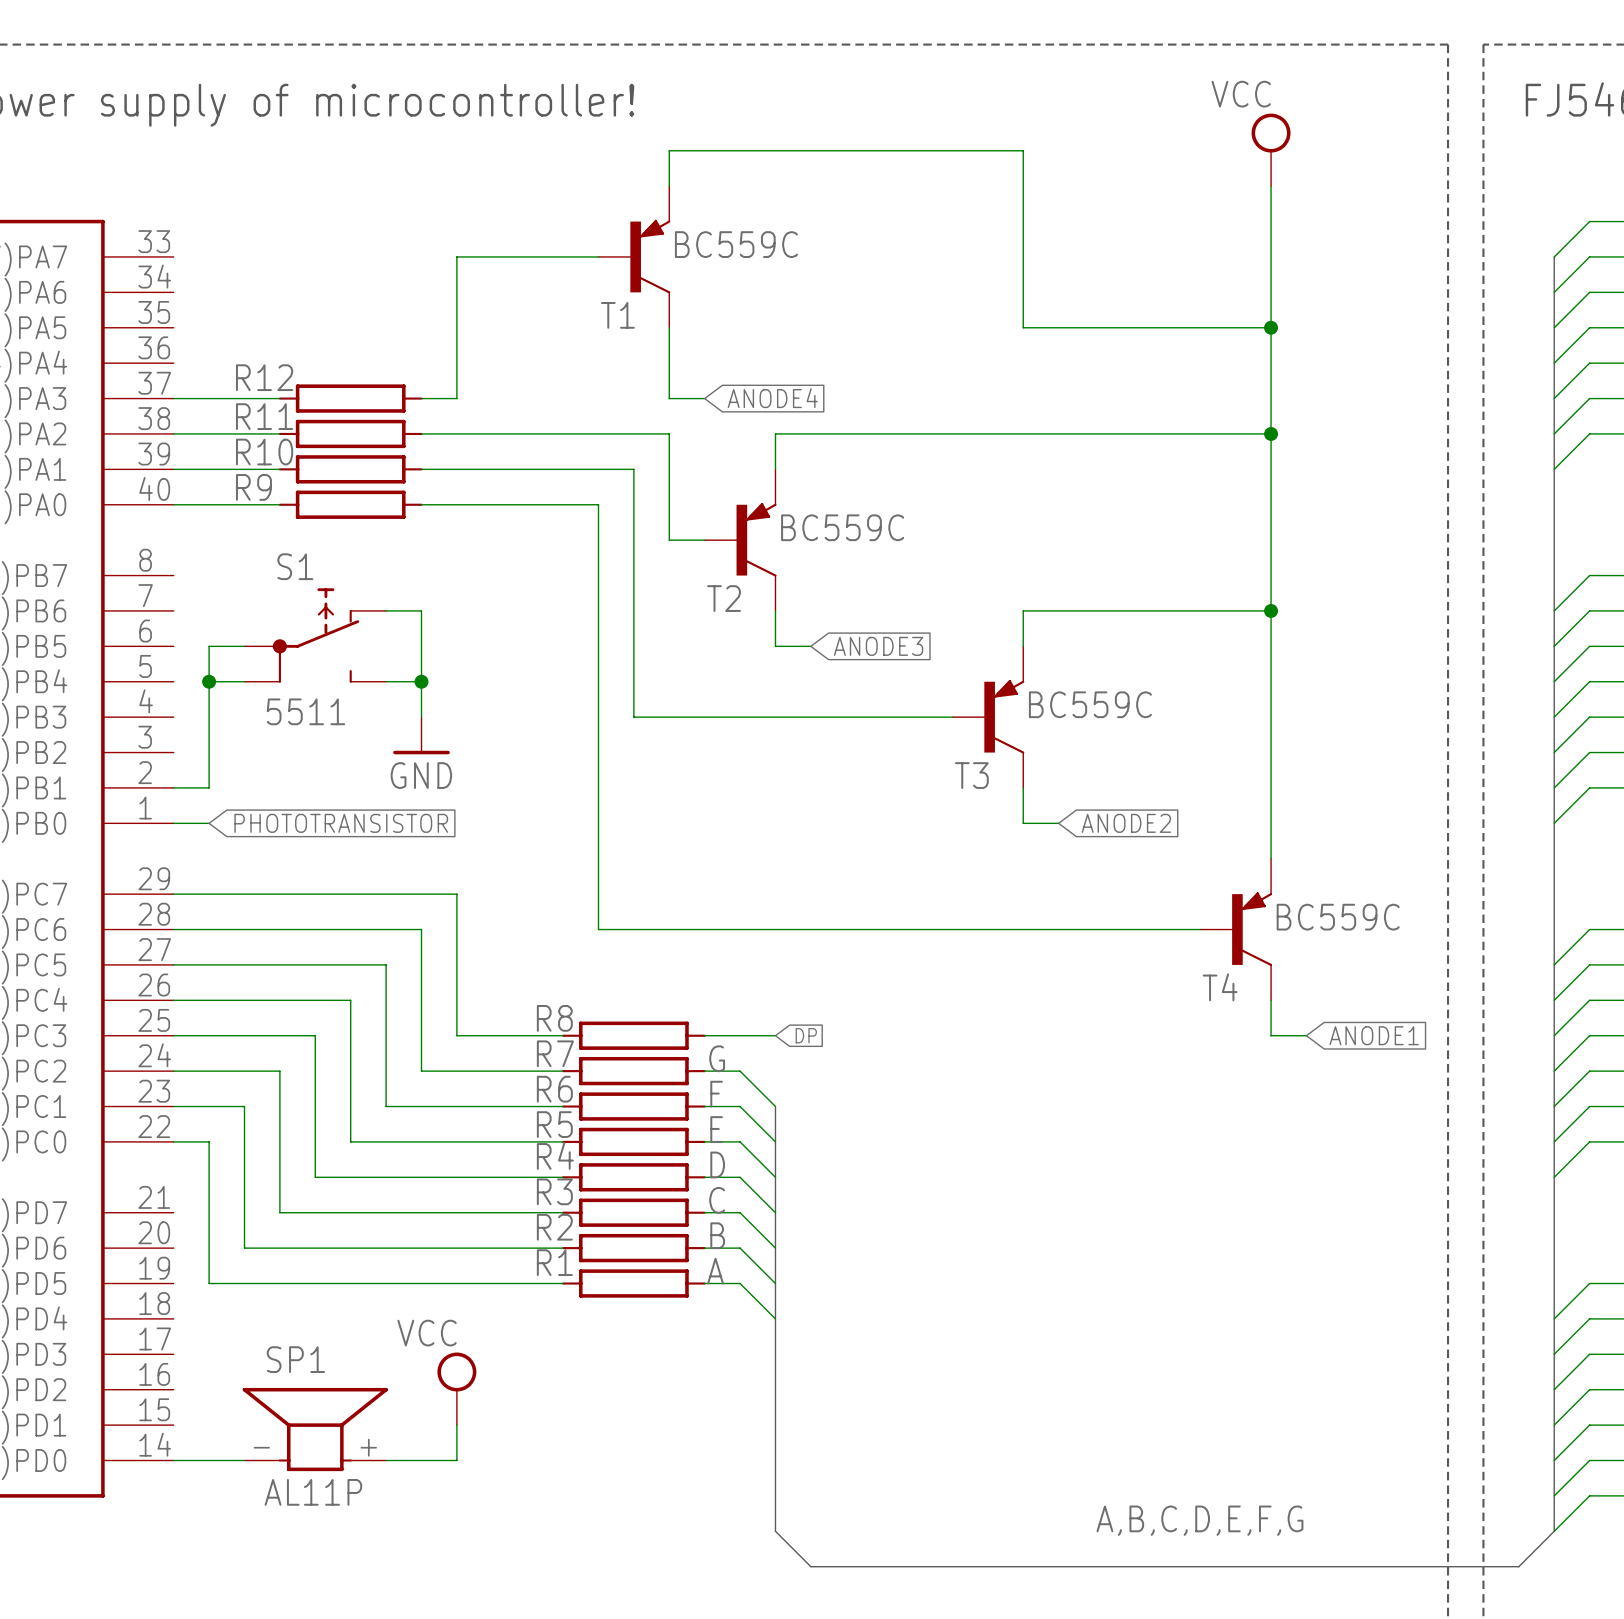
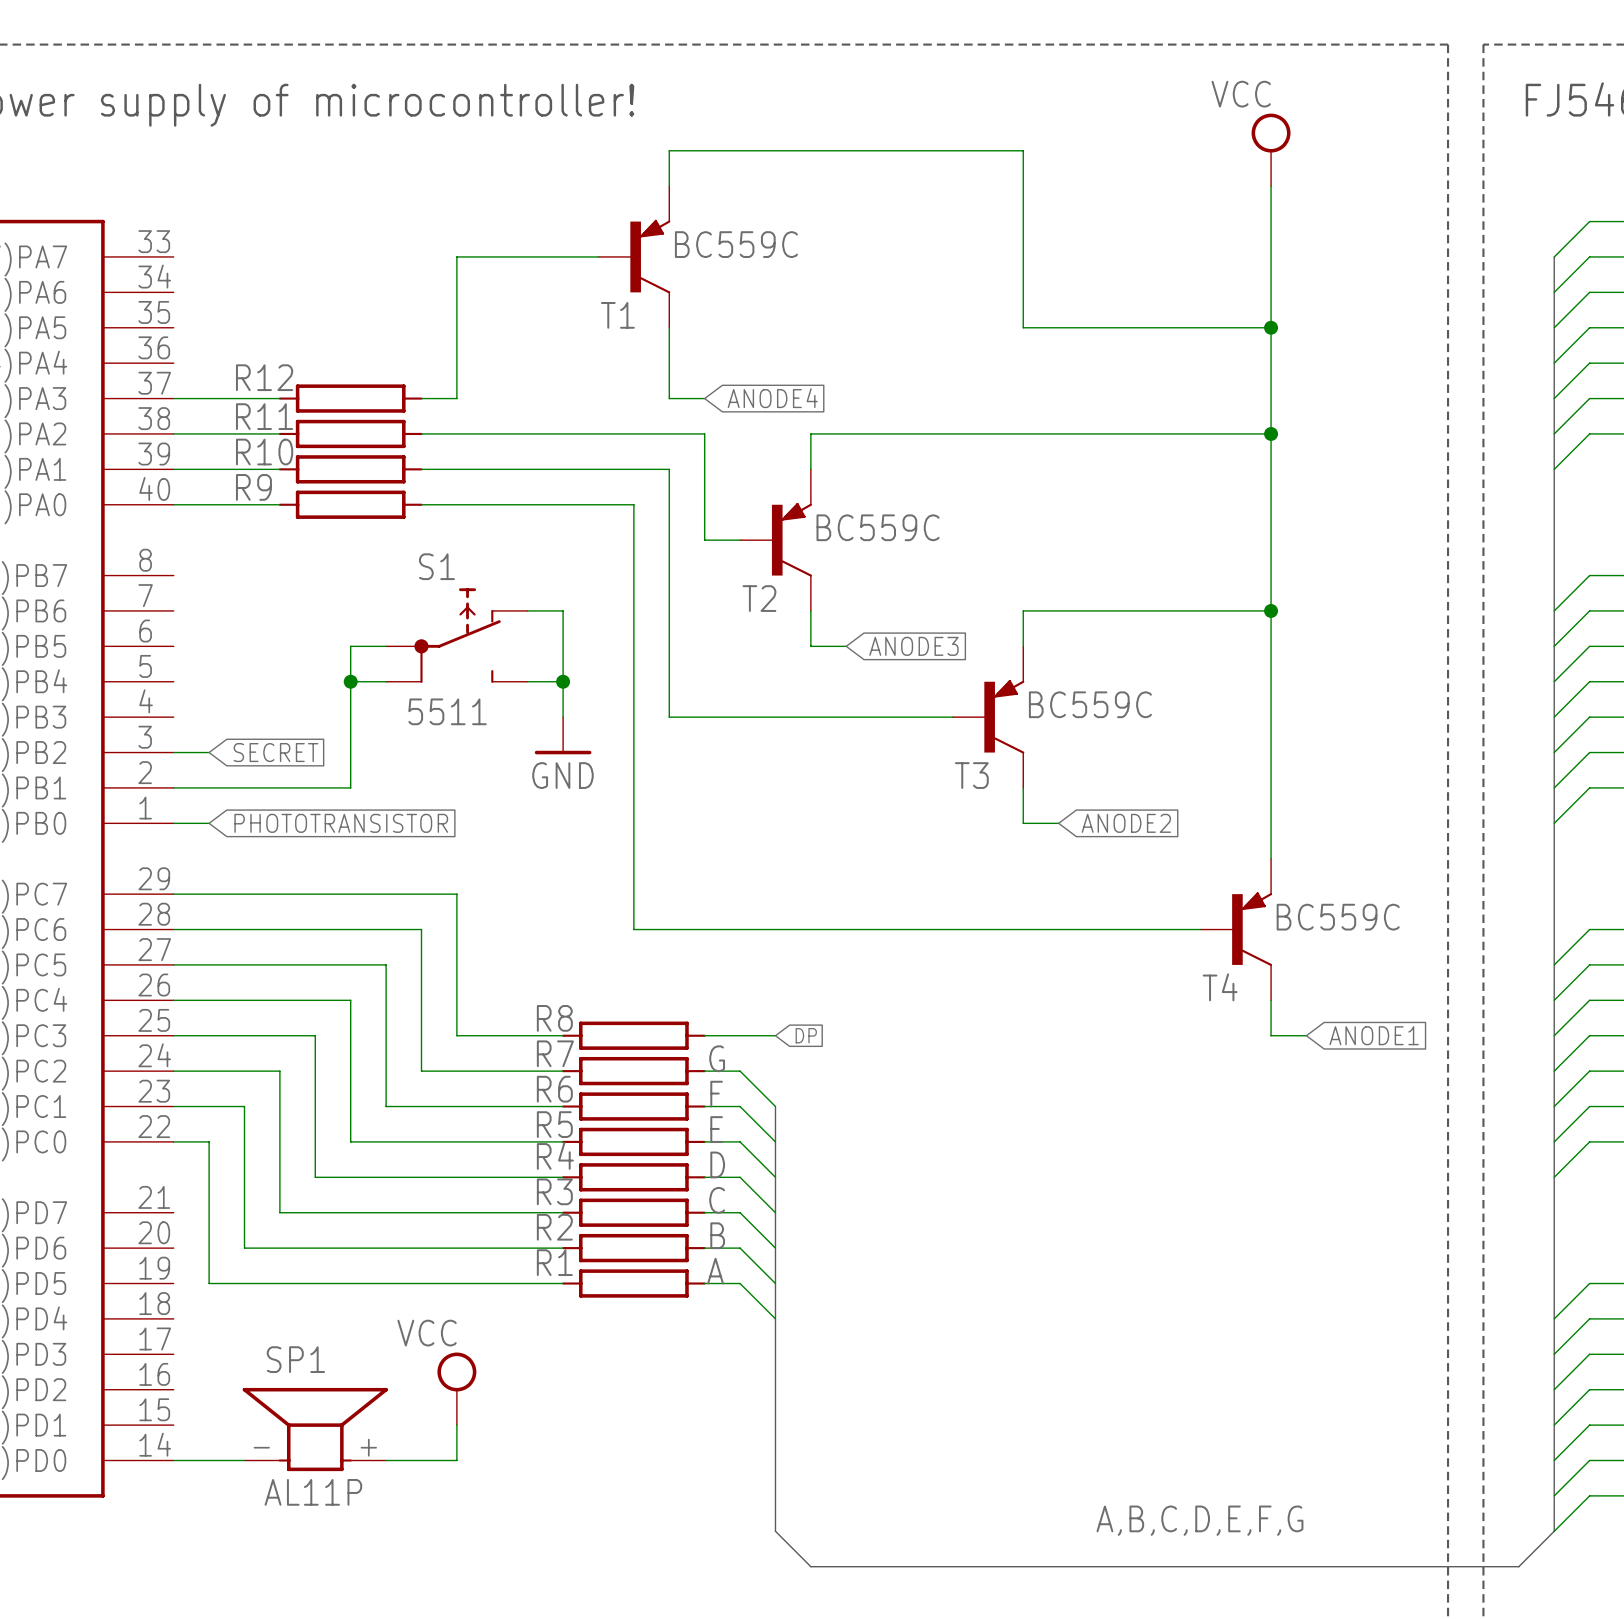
wire: (669, 433) (669, 469) -> (633, 469) (669, 469)
wire: none -> (669, 433) (704, 433) (704, 540) (740, 540)
wire: (810, 433) (775, 433) (775, 469) -> (810, 433) (810, 469)
wire: (633, 469) (633, 504) -> (598, 504) (633, 504)
wire: (598, 504) (598, 929) (633, 929) -> (633, 717) (633, 929)
wire: (669, 540) (704, 540) -> (669, 540) (669, 717)
T2 position: (740, 540) -> (776, 540)
wire: (386, 610) (421, 610) (421, 717) -> (527, 610) (563, 610) (563, 717)
wire: (775, 610) (775, 646) (810, 646) -> (810, 610) (810, 646) (846, 646)
S1 position: (315, 635) -> (456, 635)
wire: (244, 646) (209, 646) (209, 787) -> (386, 646) (350, 646) (350, 787) (209, 787)
global label position: ANODE3 (878, 646) -> ANODE3 (913, 646)
wire: (209, 681) (244, 681) -> (173, 752) (209, 752)
junction: (209, 681) -> none
junction: none -> (350, 681)
junction: (421, 681) -> none
junction: none -> (563, 681)
wire: (633, 717) (669, 717) -> (527, 681) (563, 681)
power symbol position: GND (421, 735) -> GND (563, 735)
global label: none -> SECRET (276, 752)

